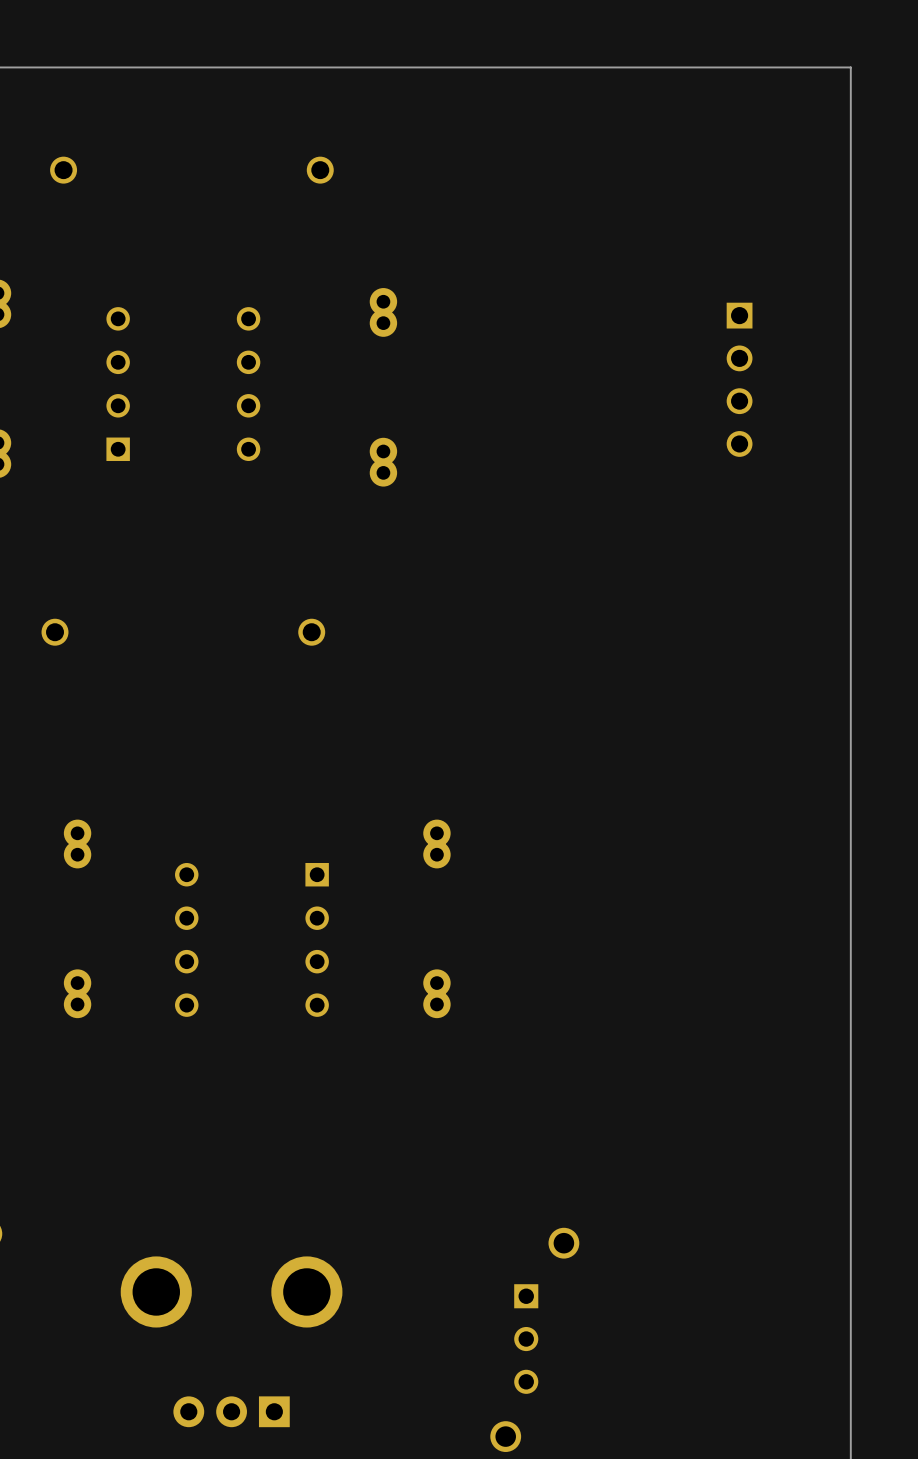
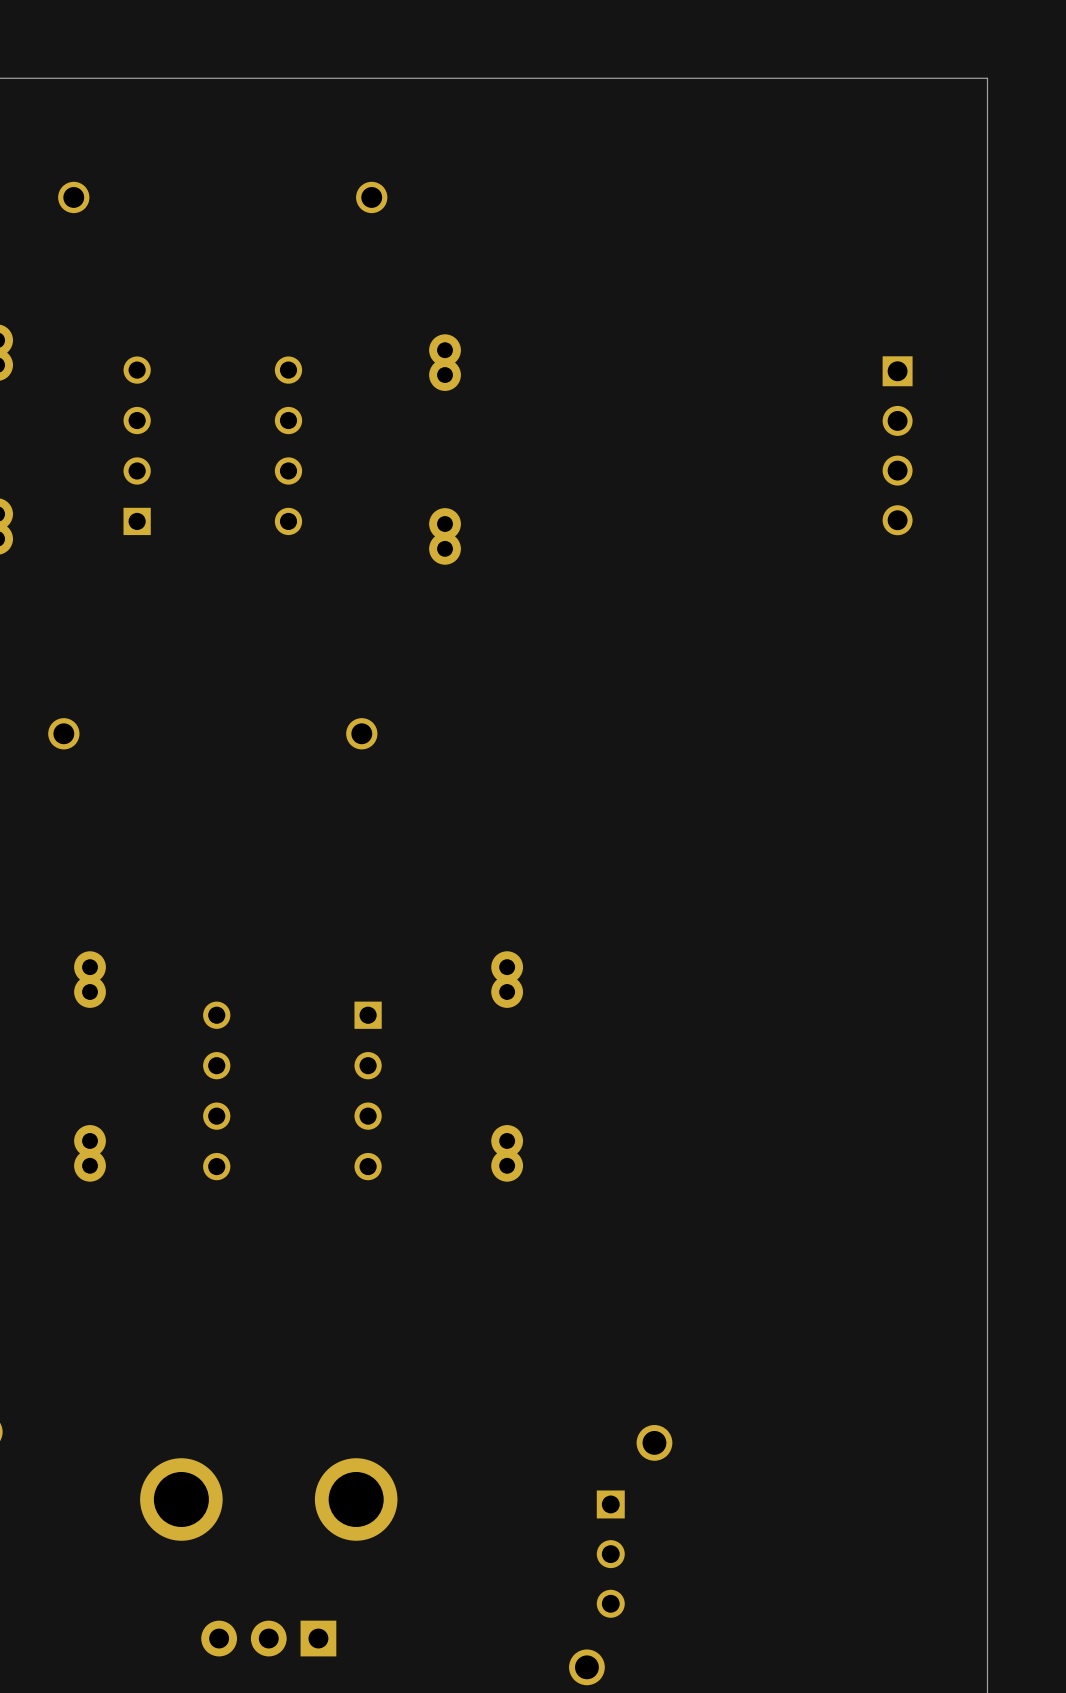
part position: (739, 379) -> (897, 445)

